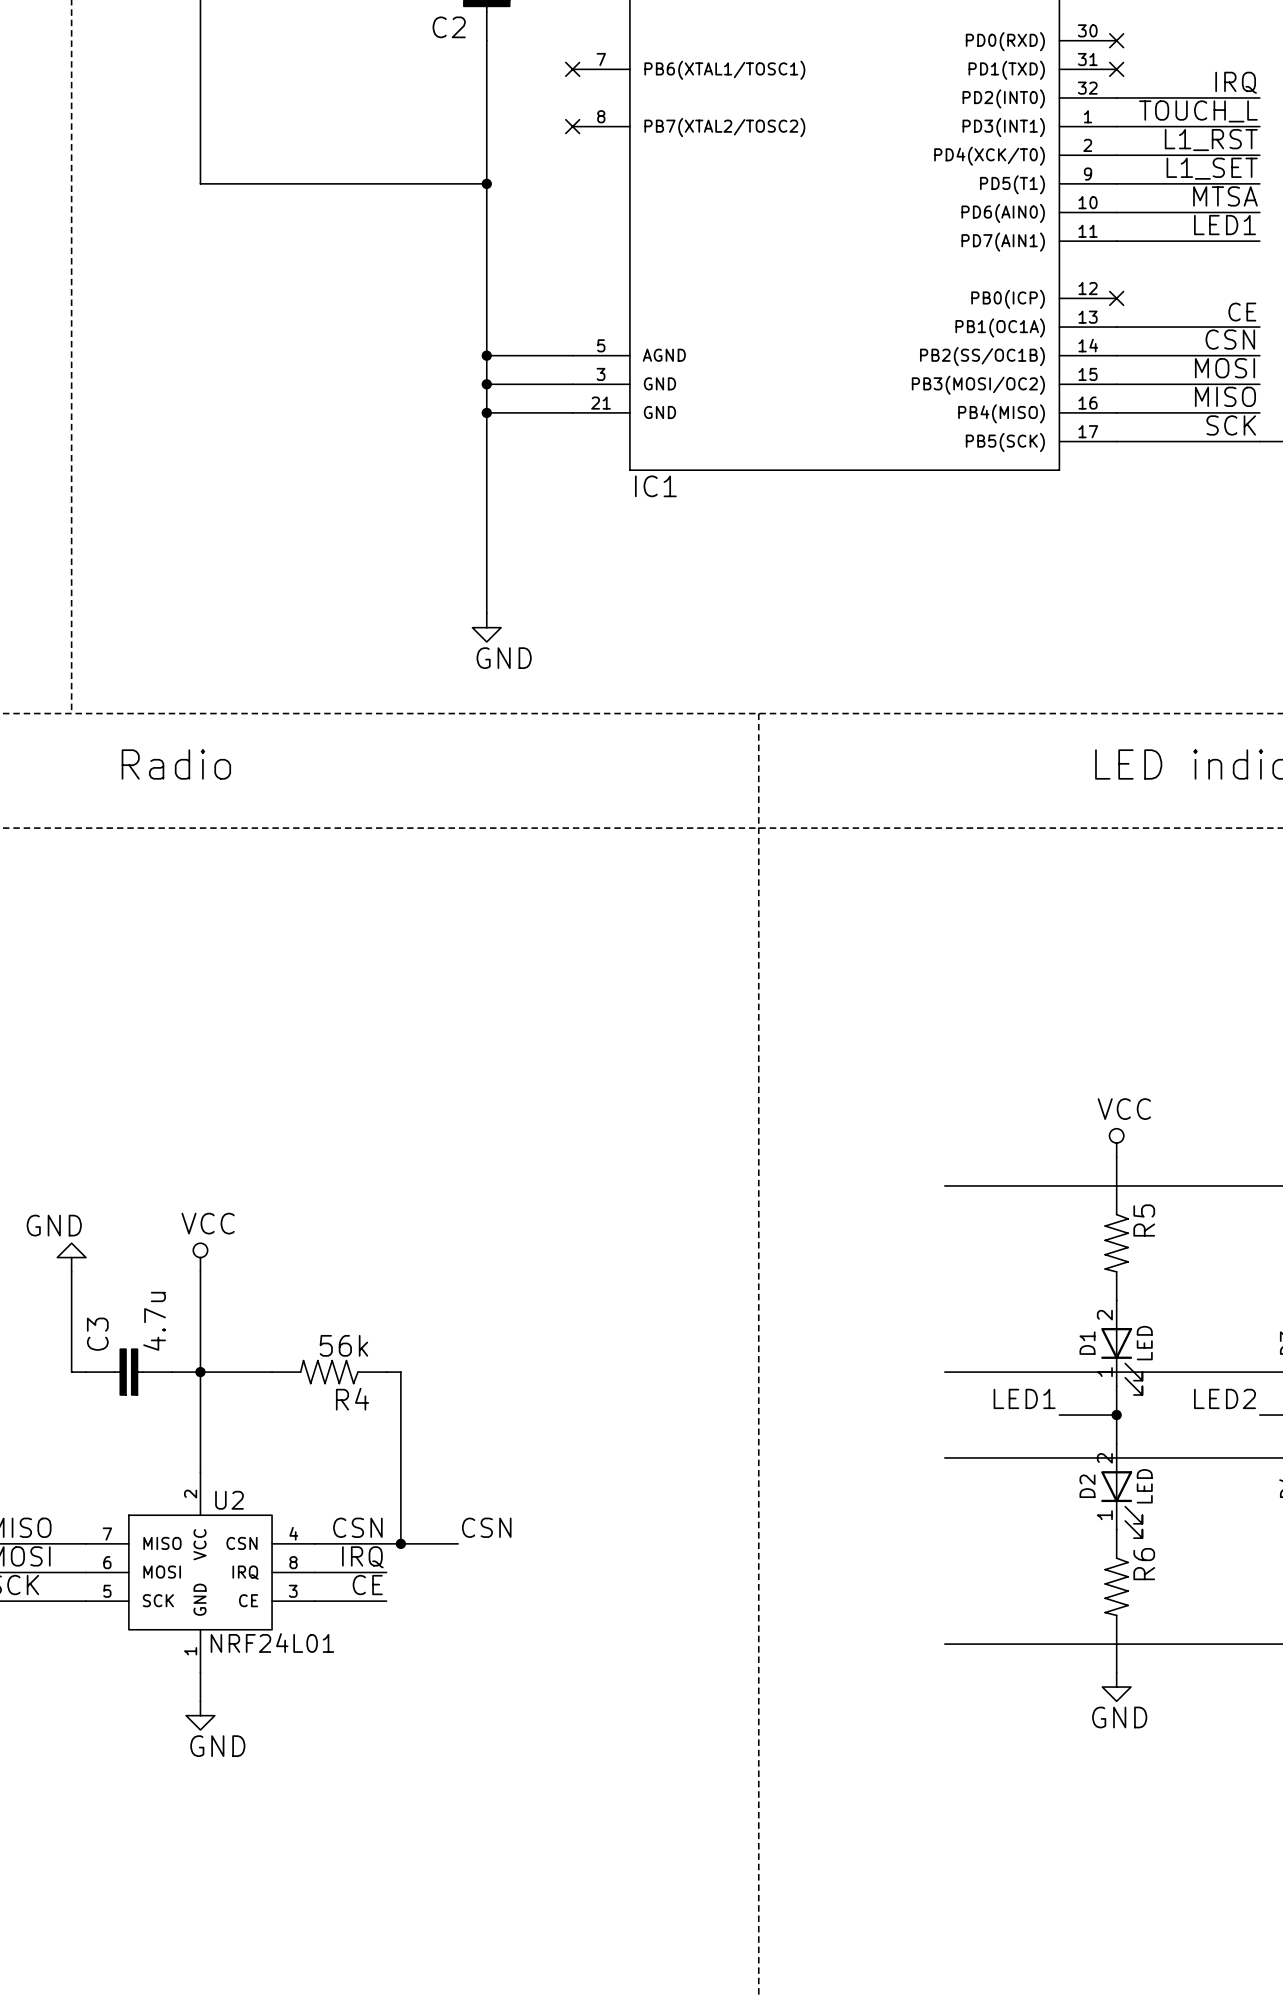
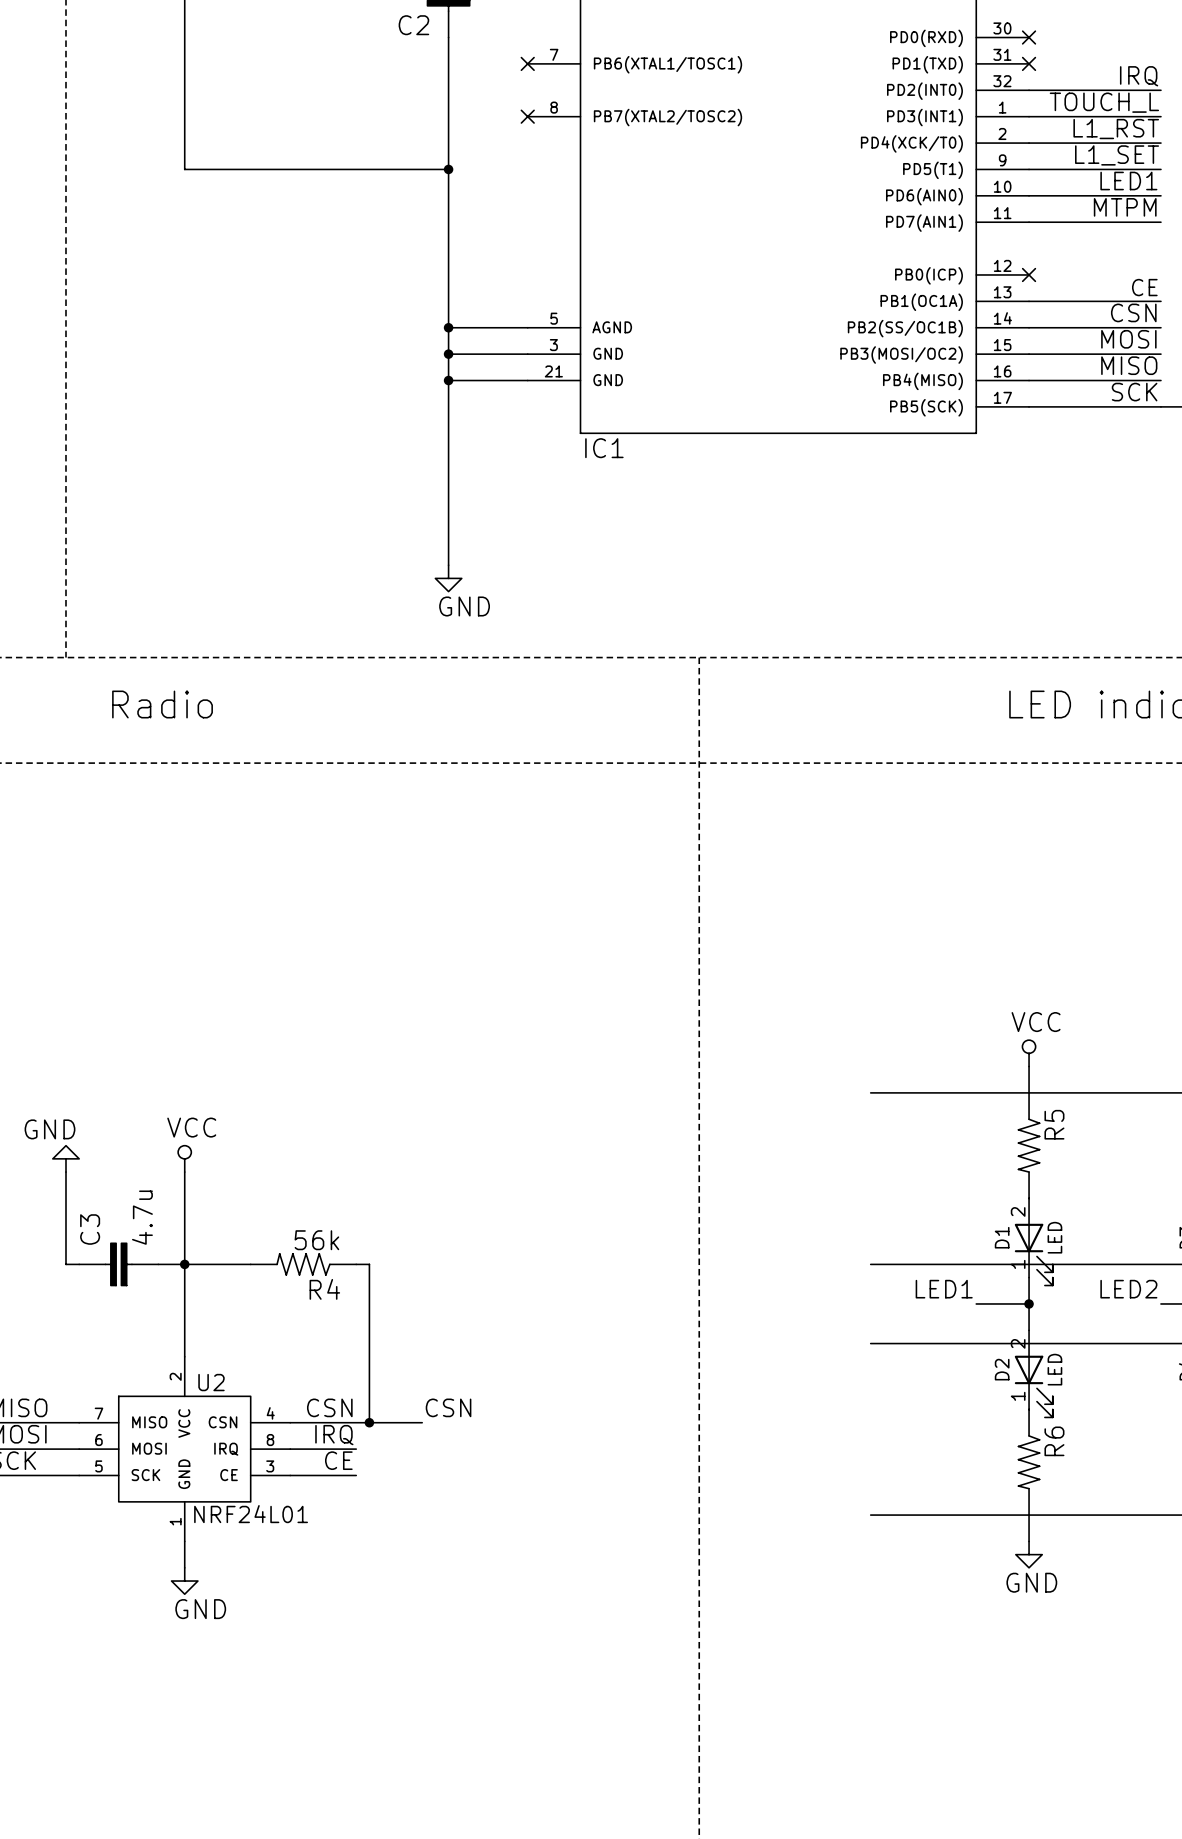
label: MTSA (1225, 196) -> LED1 (1128, 181)
label: LED1 (1225, 225) -> MTPM (1125, 207)

